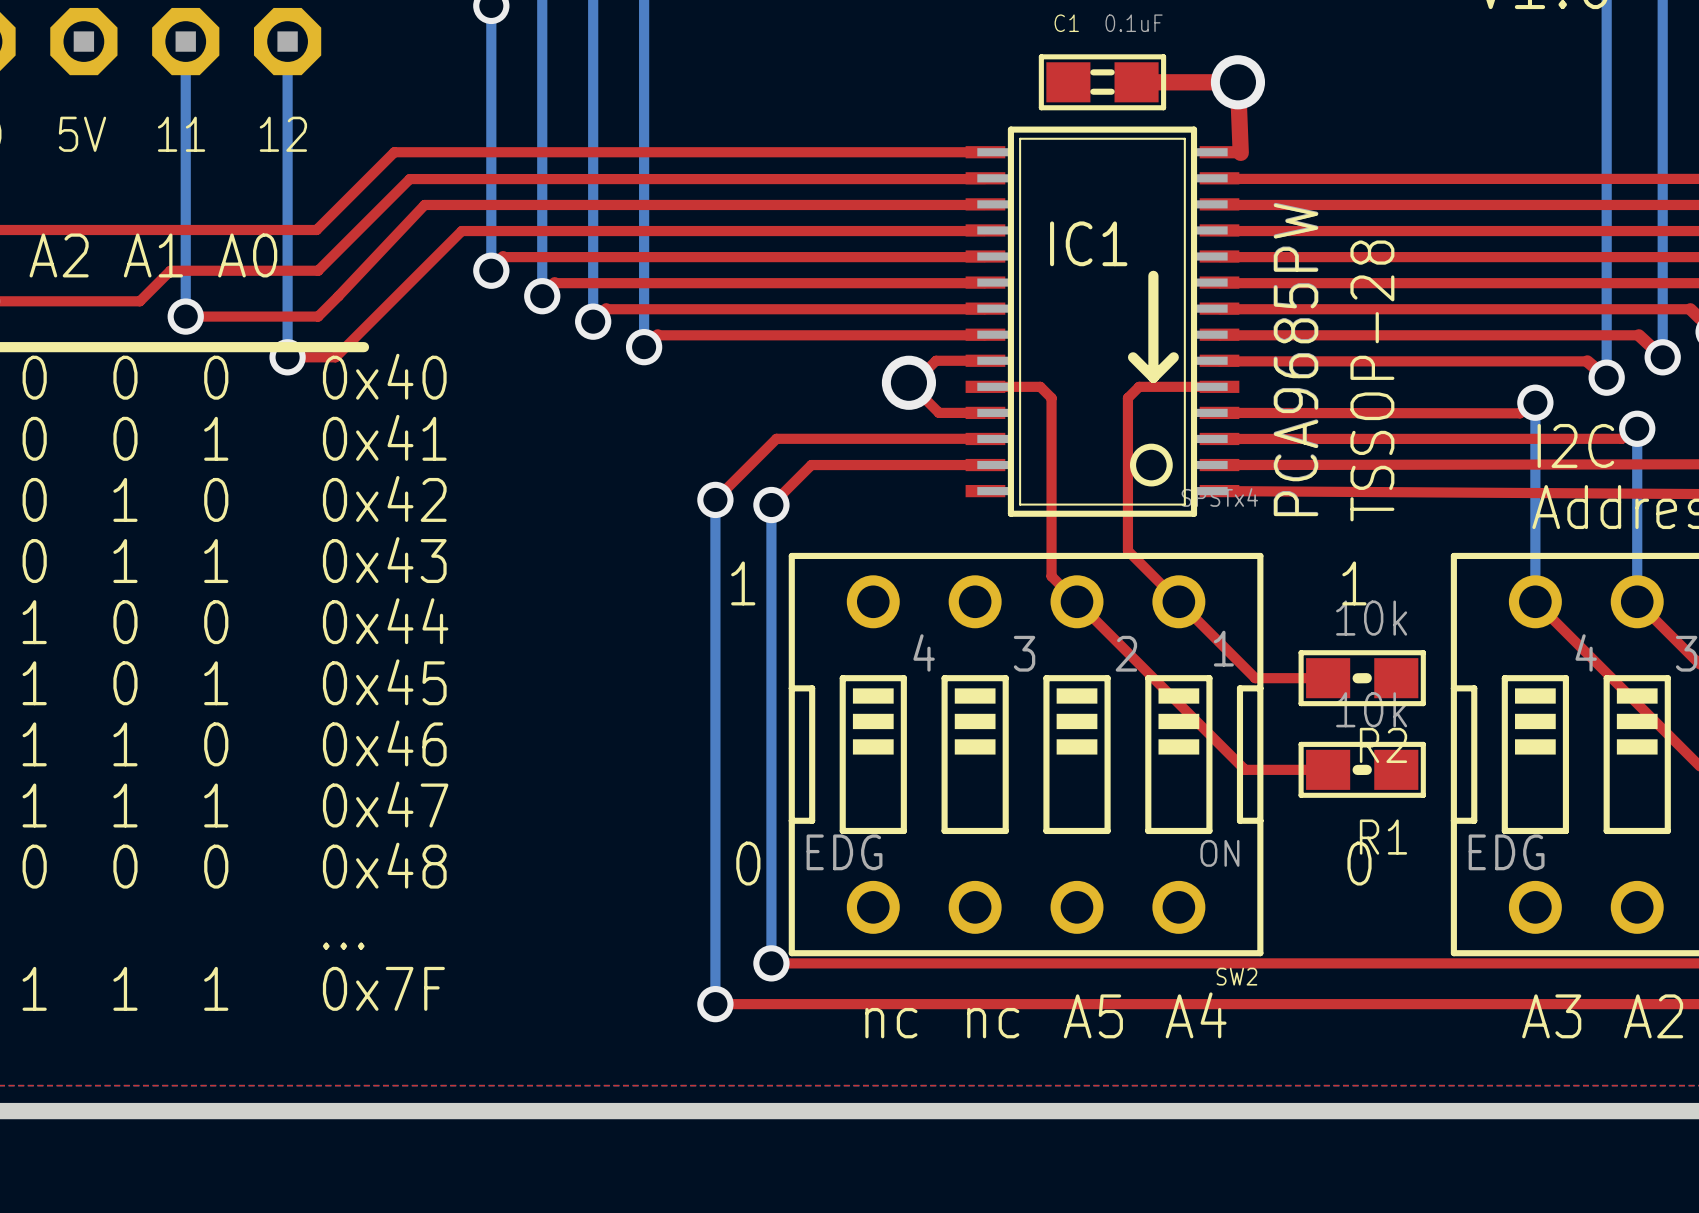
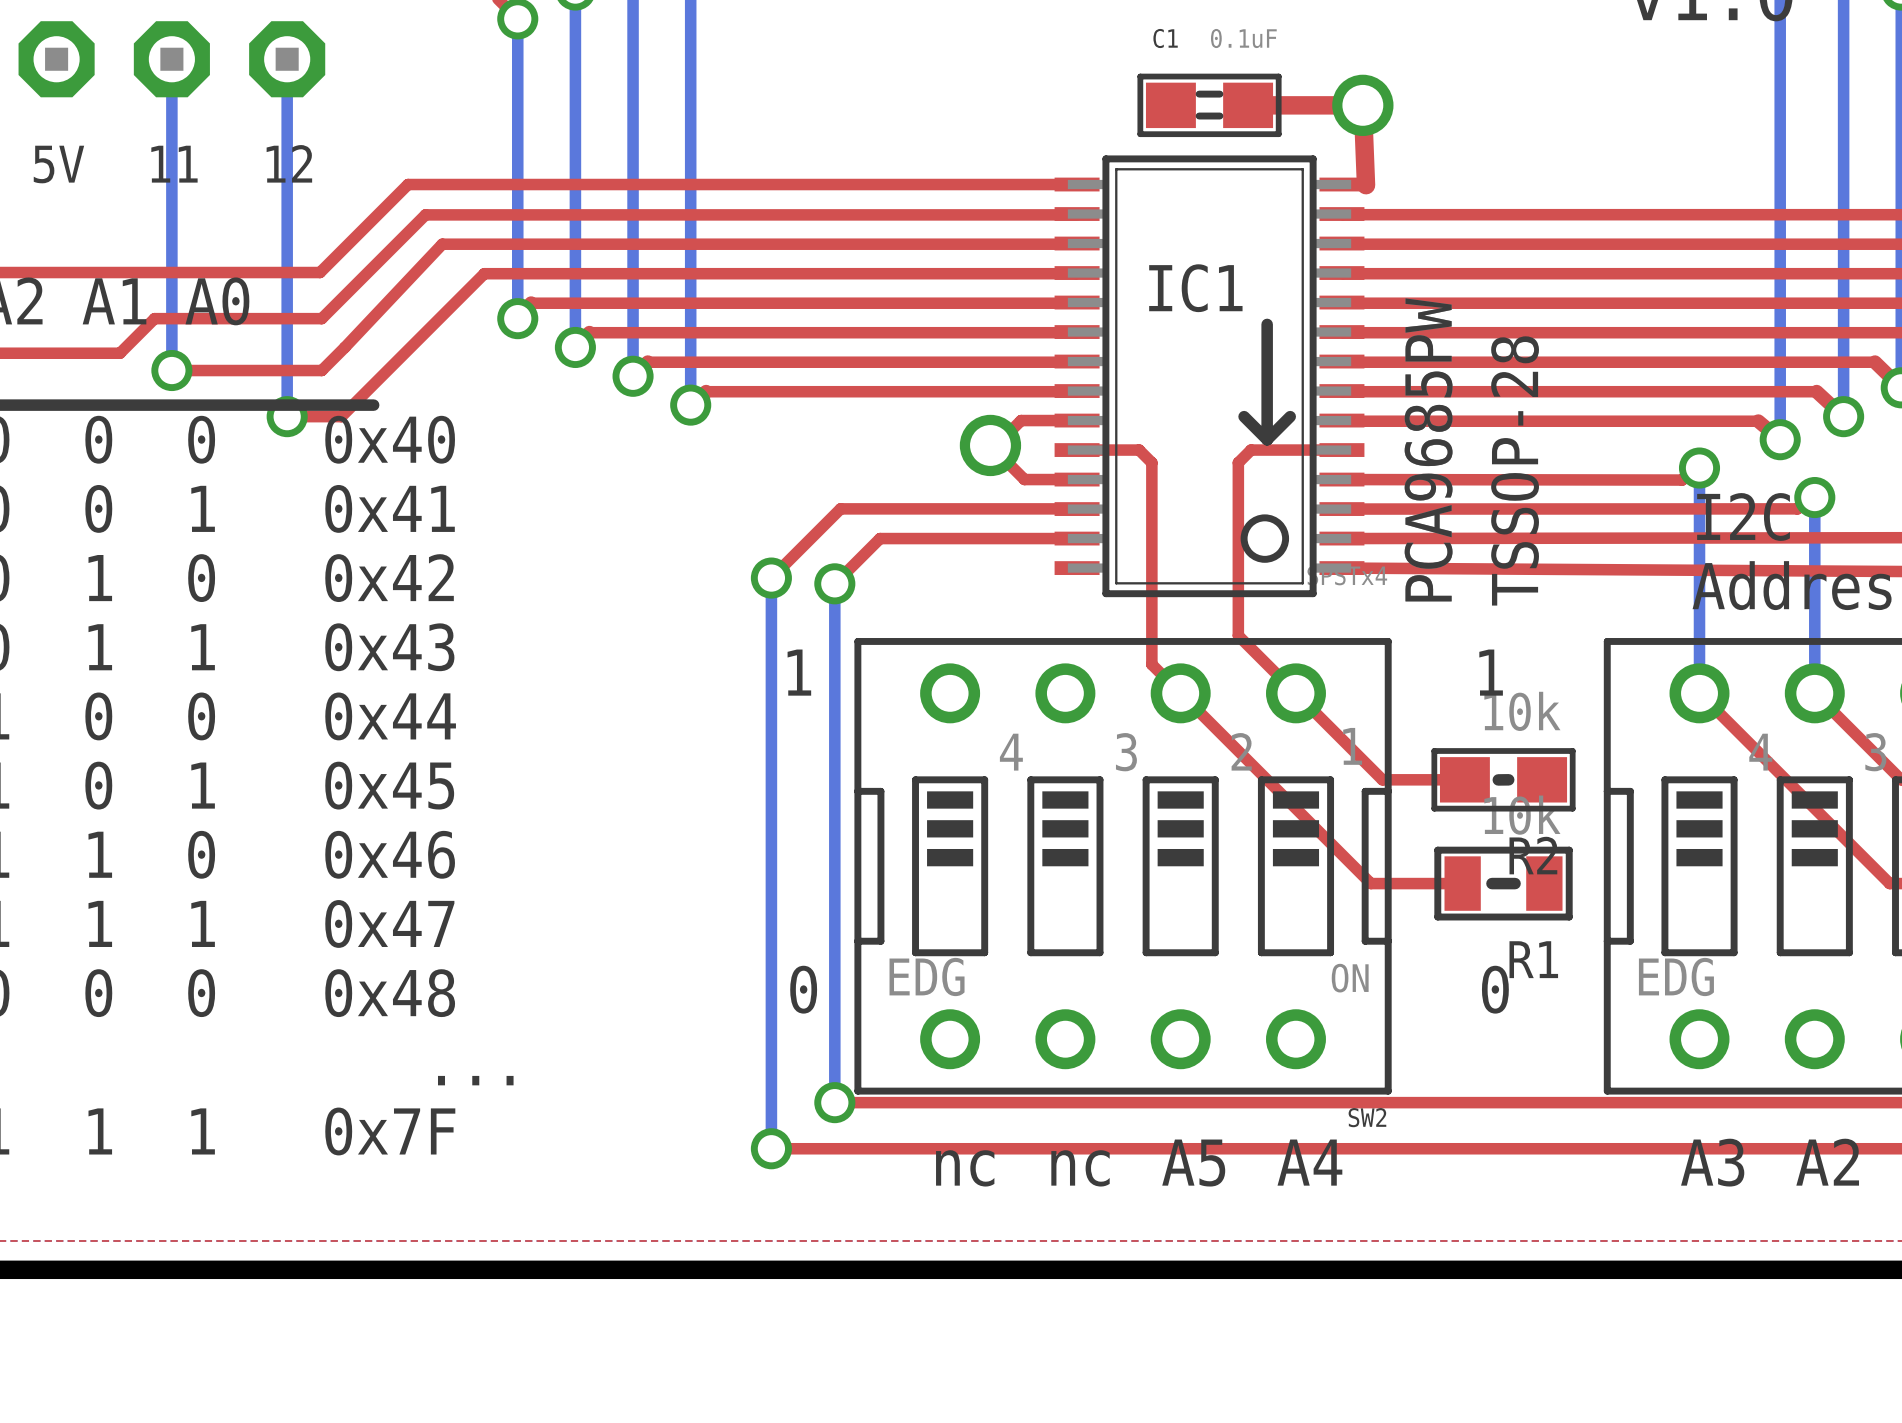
R1 footprint: [1298, 741, 1426, 798] -> [1434, 846, 1573, 921]

